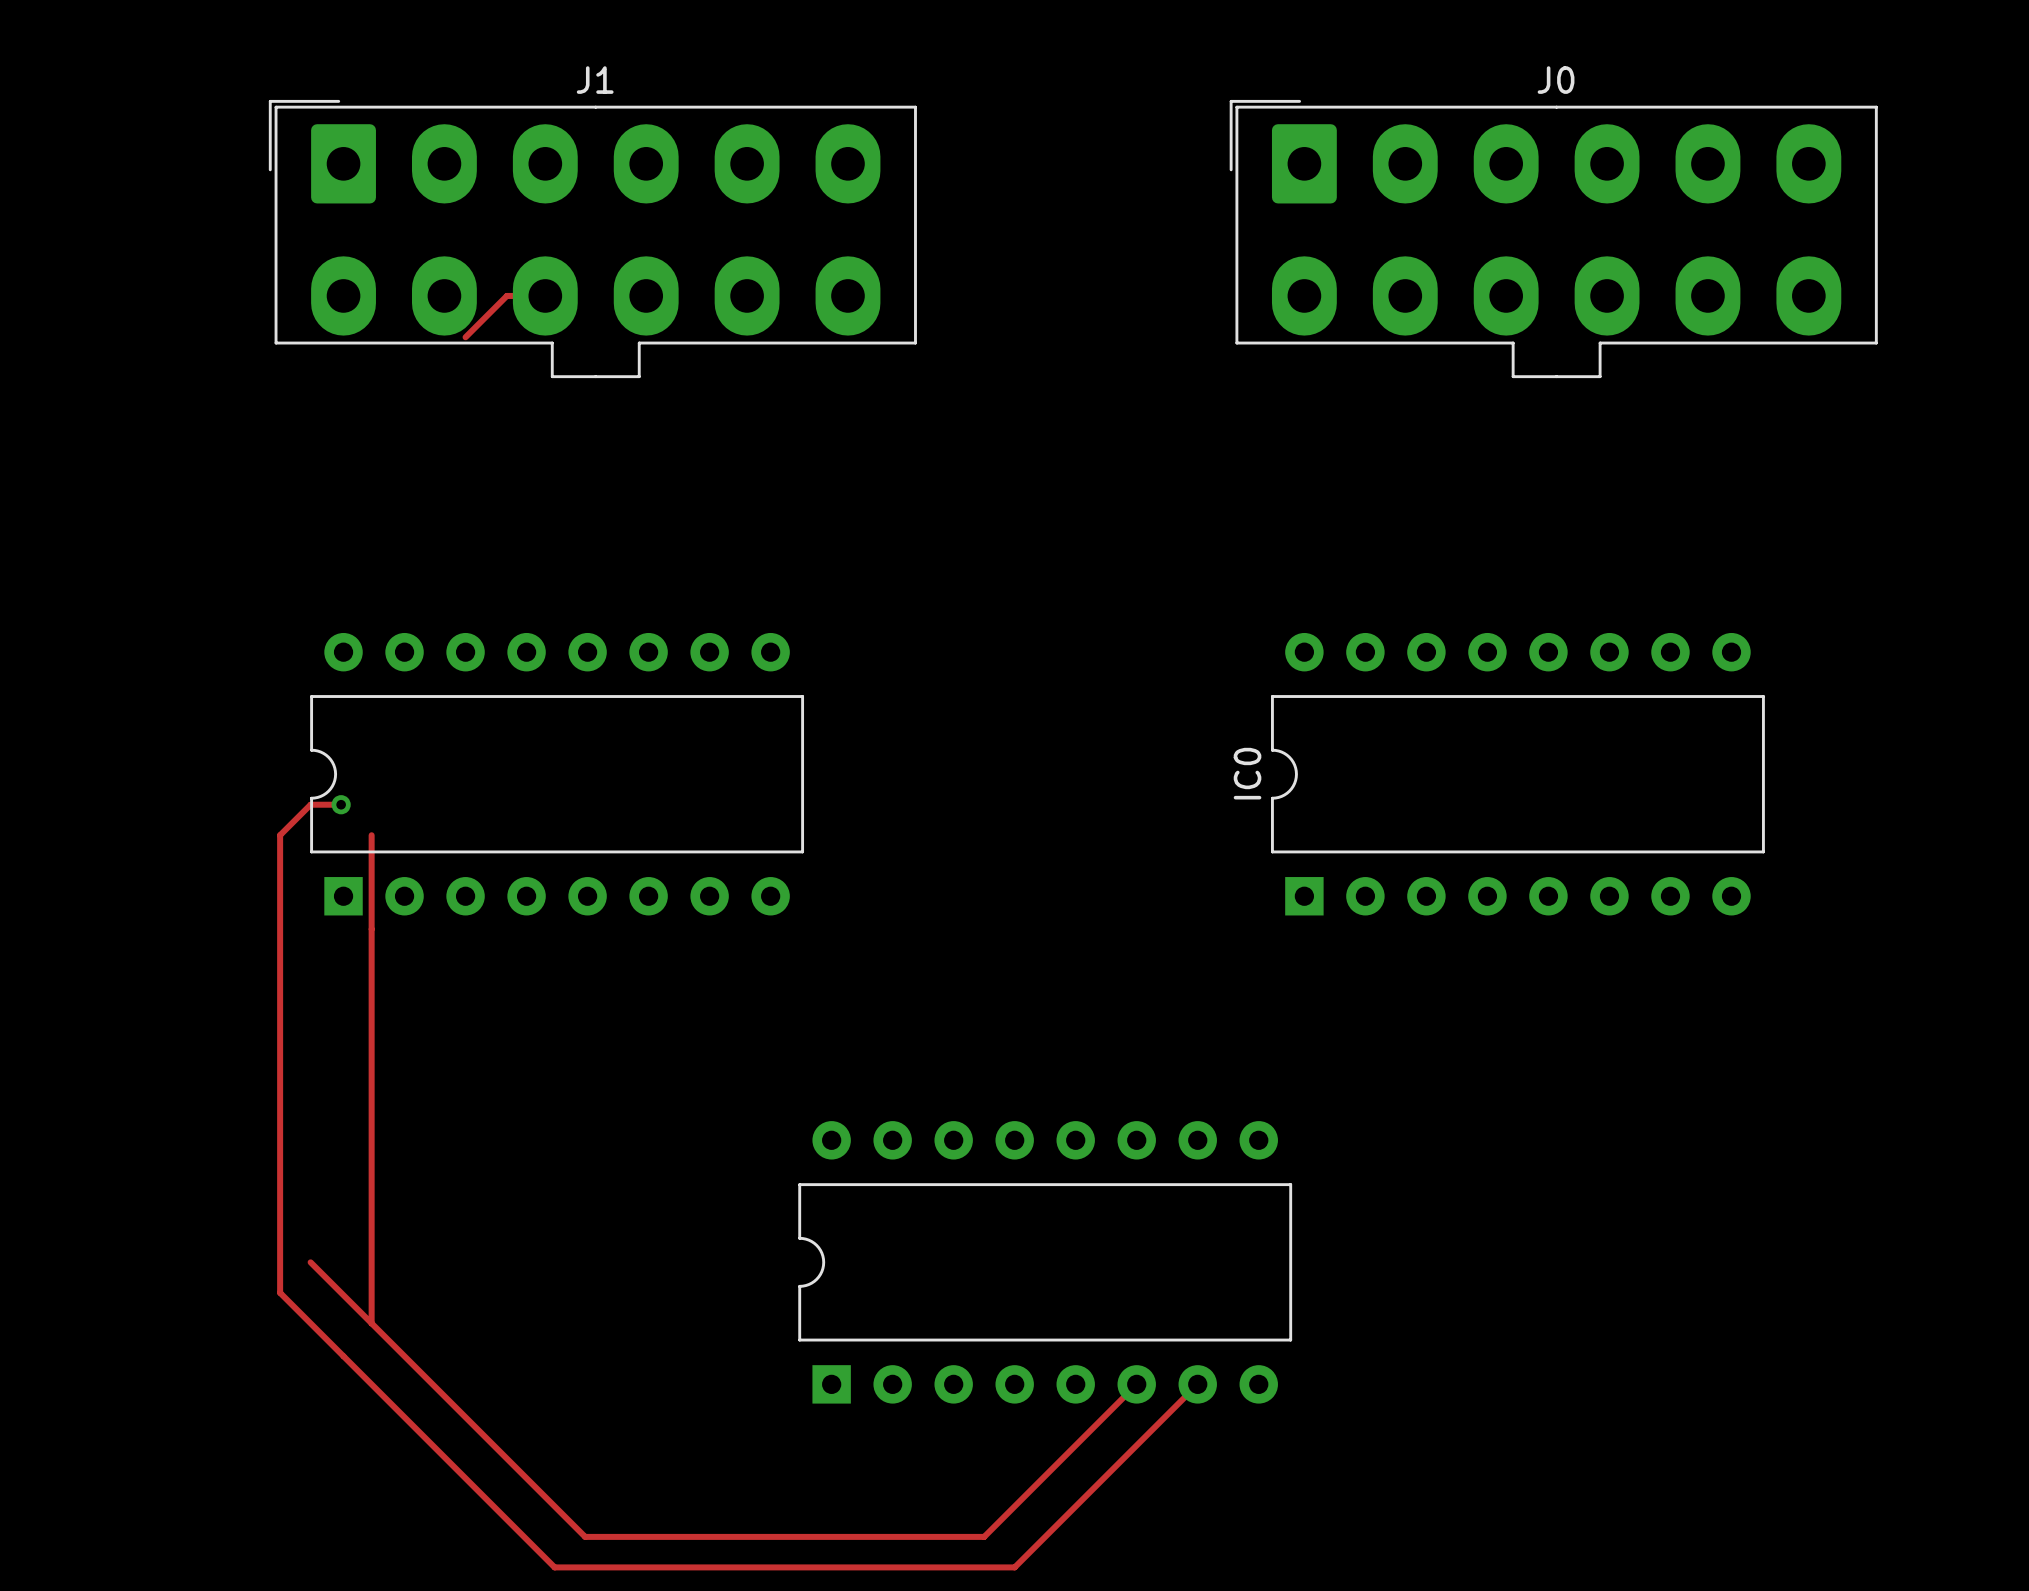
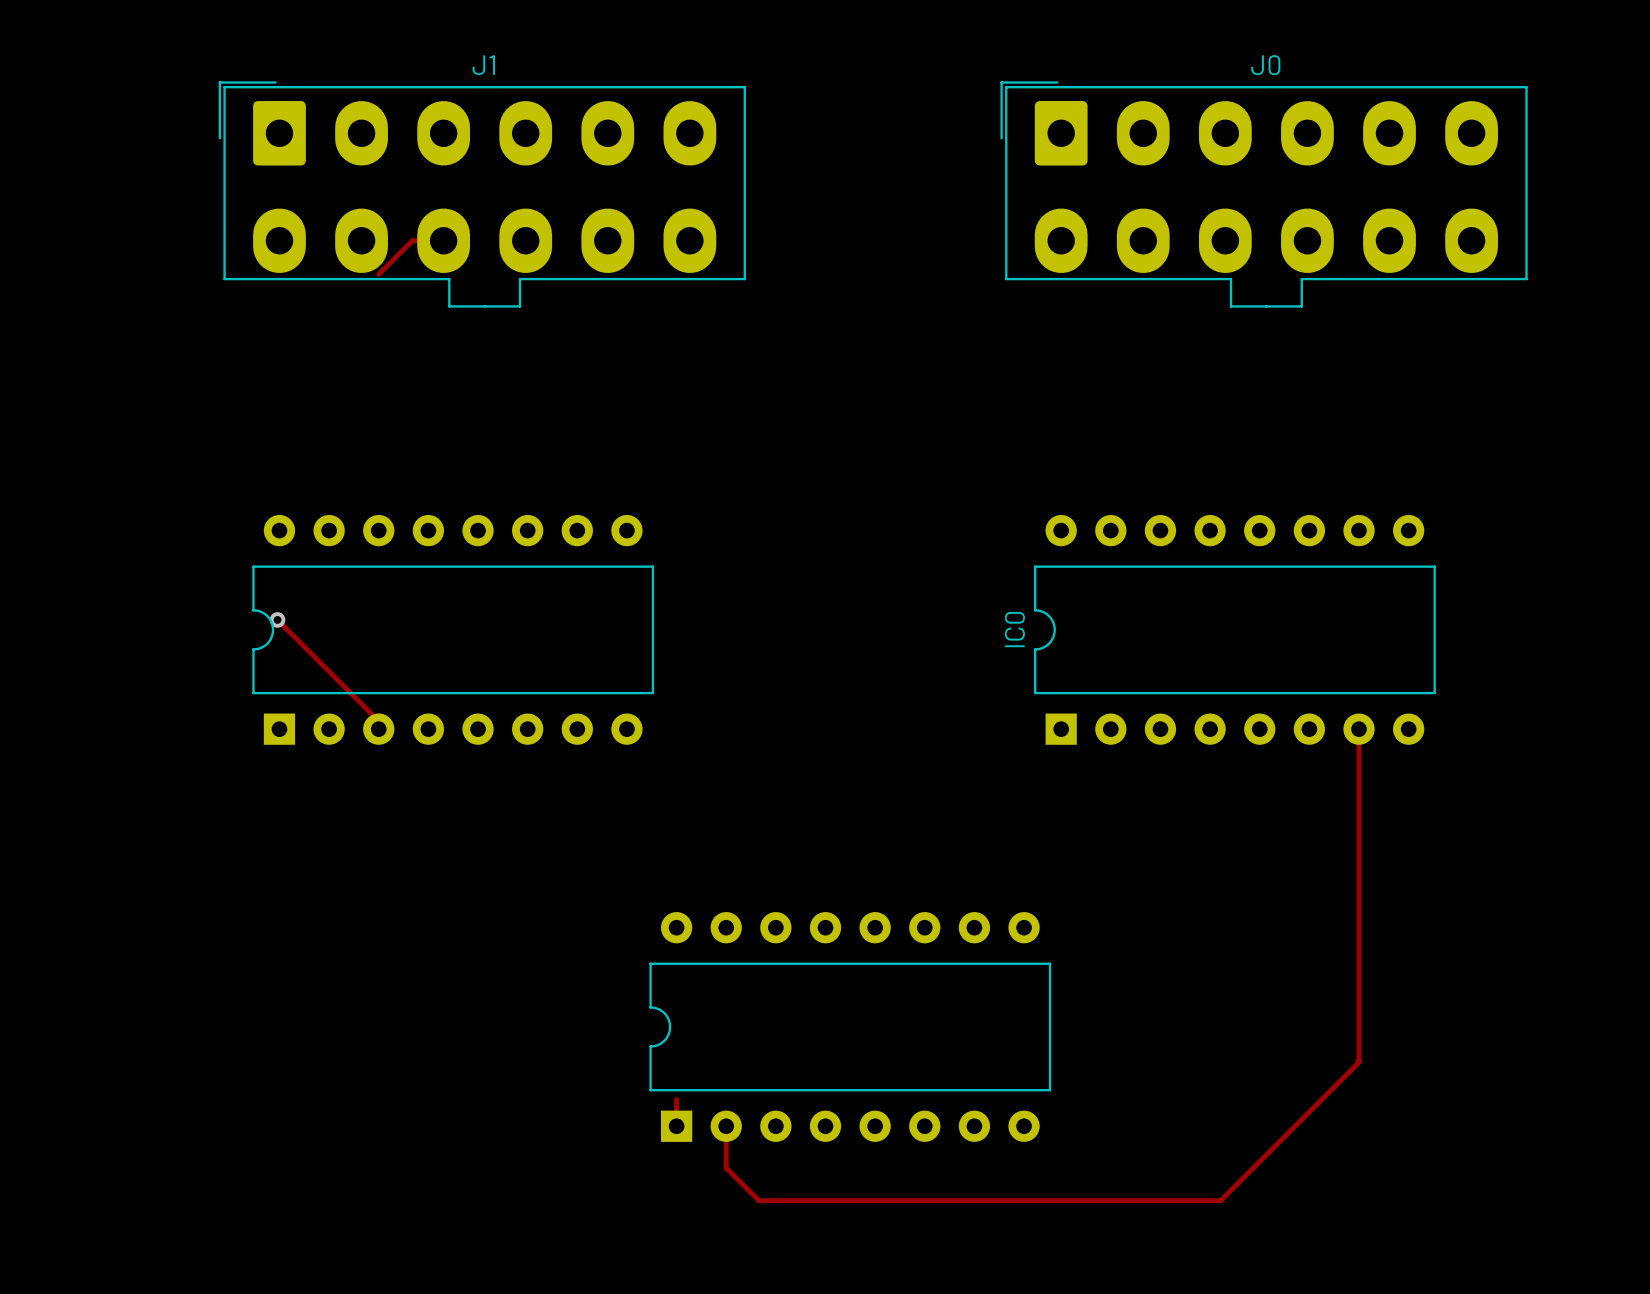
track: none -> (277, 619) (378, 721) (378, 729)
track: (341, 804) (310, 804) (280, 835) (280, 1292) (554, 1567) (1014, 1567) (1197, 1384) -> none
via position: (341, 804) -> (277, 619)
track: (371, 835) (371, 1323) -> none
track: none -> (1359, 729) (1359, 1061) (1220, 1200) (759, 1200) (726, 1167) (726, 1126)
track: (310, 1262) (585, 1536) (984, 1536) (1136, 1384) -> none
track: none -> (676, 1099) (676, 1126)

